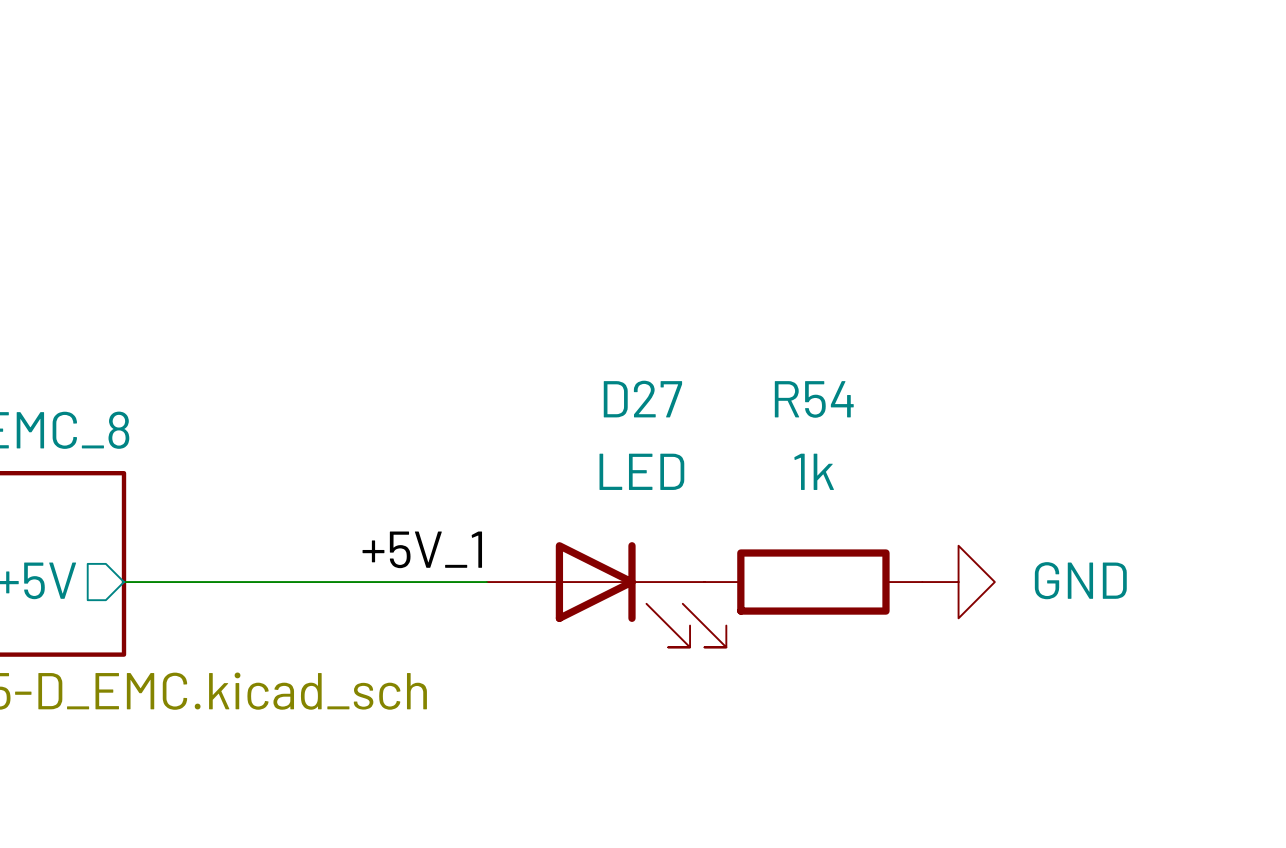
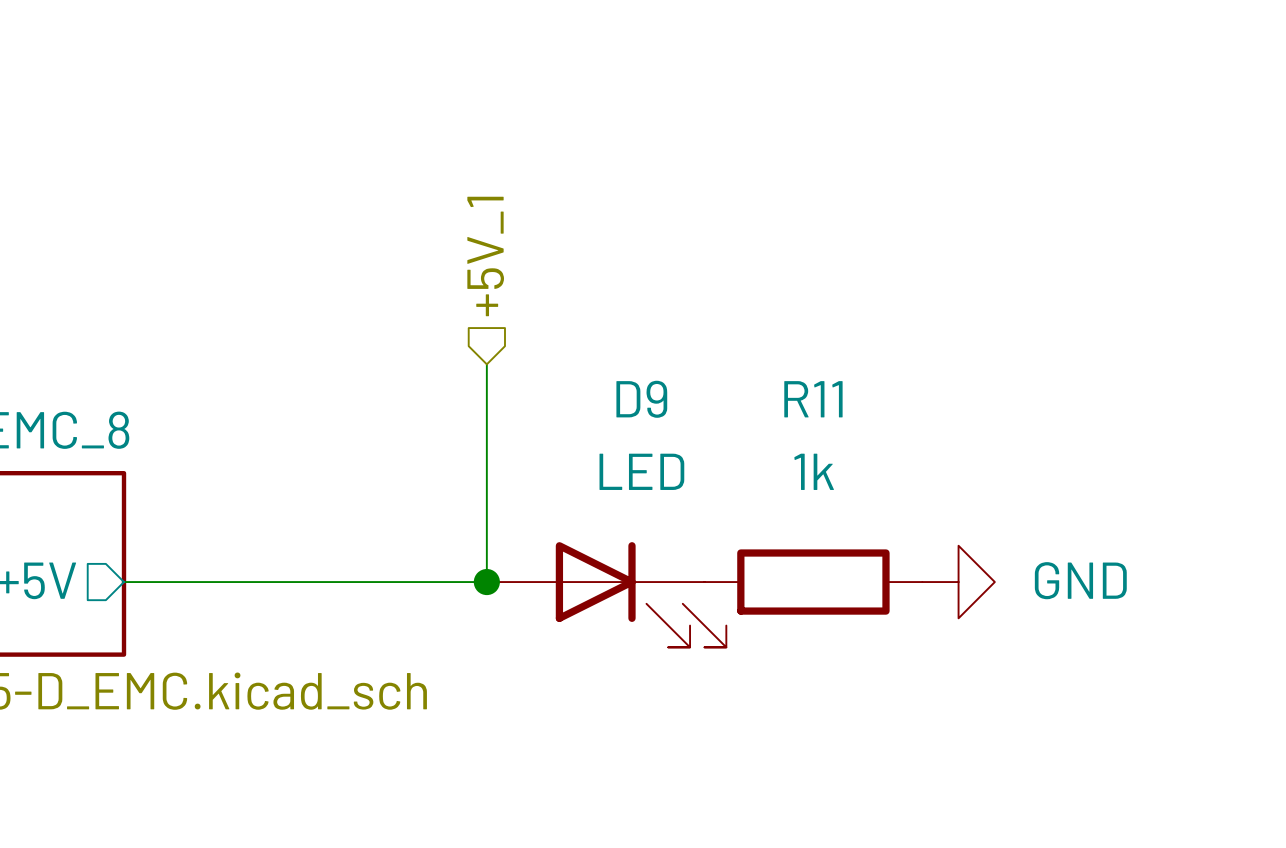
hierarchical label: none -> +5V_1 (485, 256)
wire: none -> (486, 364) (486, 582)
D27 name: D27 (642, 399) -> D9 (641, 399)
R54 name: R54 (814, 399) -> R11 (813, 399)
label: +5V_1 (422, 549) -> none
junction: none -> (486, 582)

